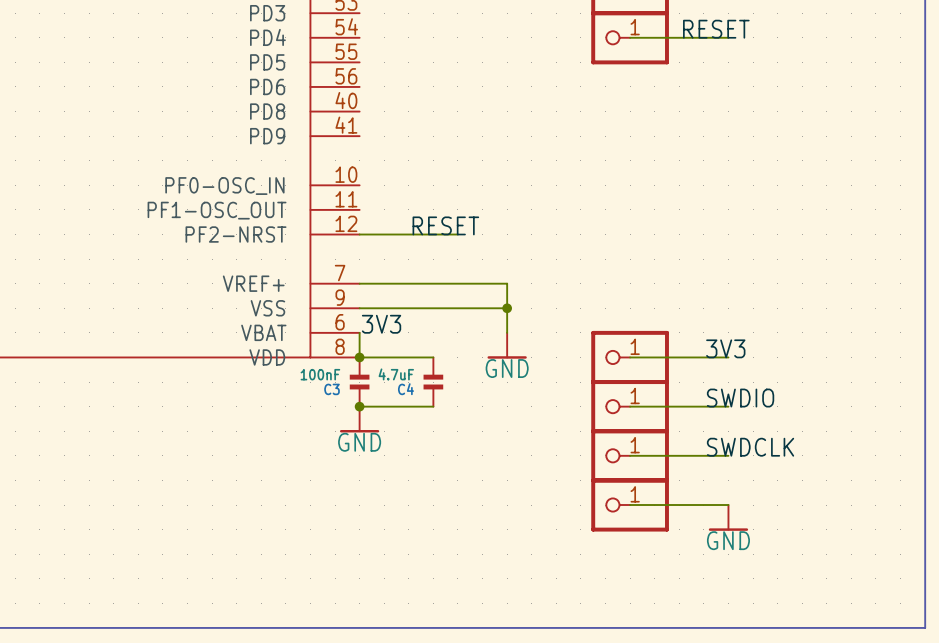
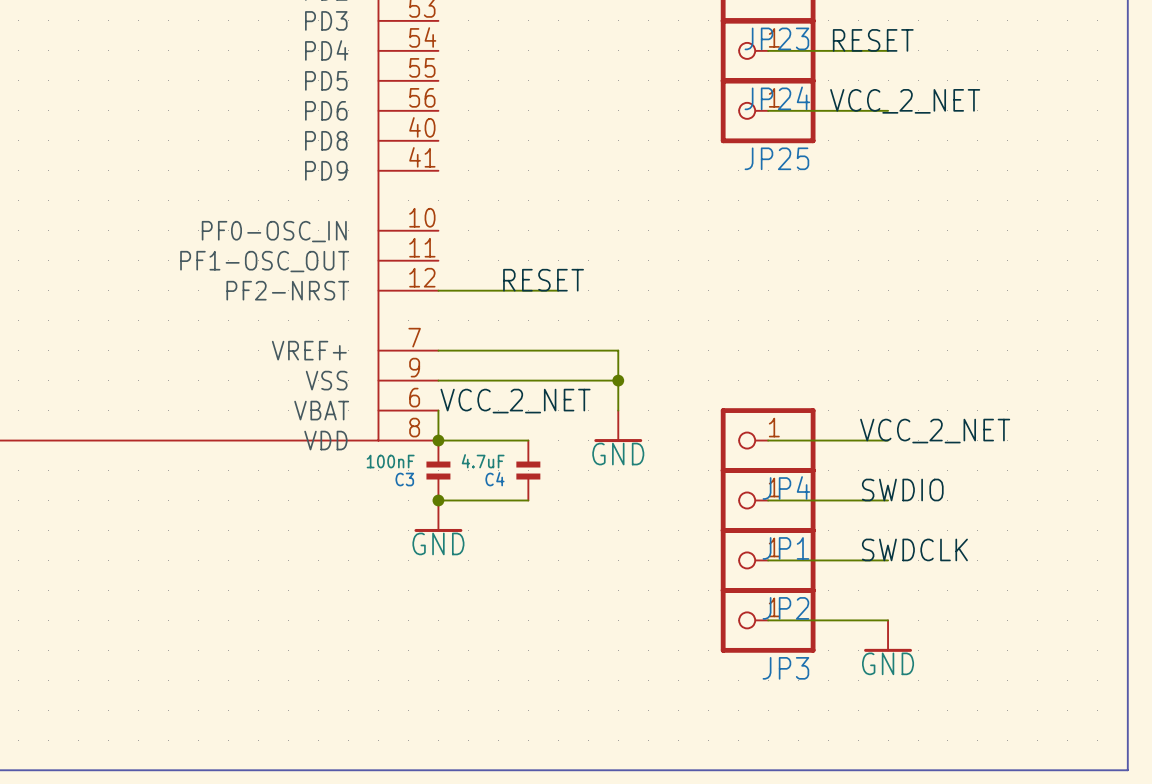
JP23 name: none -> JP23 (776, 38)
JP24 name: none -> JP24 (777, 98)
label: none -> VCC_2_NET (905, 101)
wire: none -> (768, 110) (888, 110)
JP25: none -> (768, 110)
label: 3V3 (381, 324) -> VCC_2_NET (515, 401)
label: 3V3 (725, 348) -> VCC_2_NET (935, 431)
JP4 name: none -> JP4 (786, 488)
JP1 name: none -> JP1 (785, 548)
JP2 name: none -> JP2 (785, 608)
JP3 name: none -> JP3 (785, 668)

